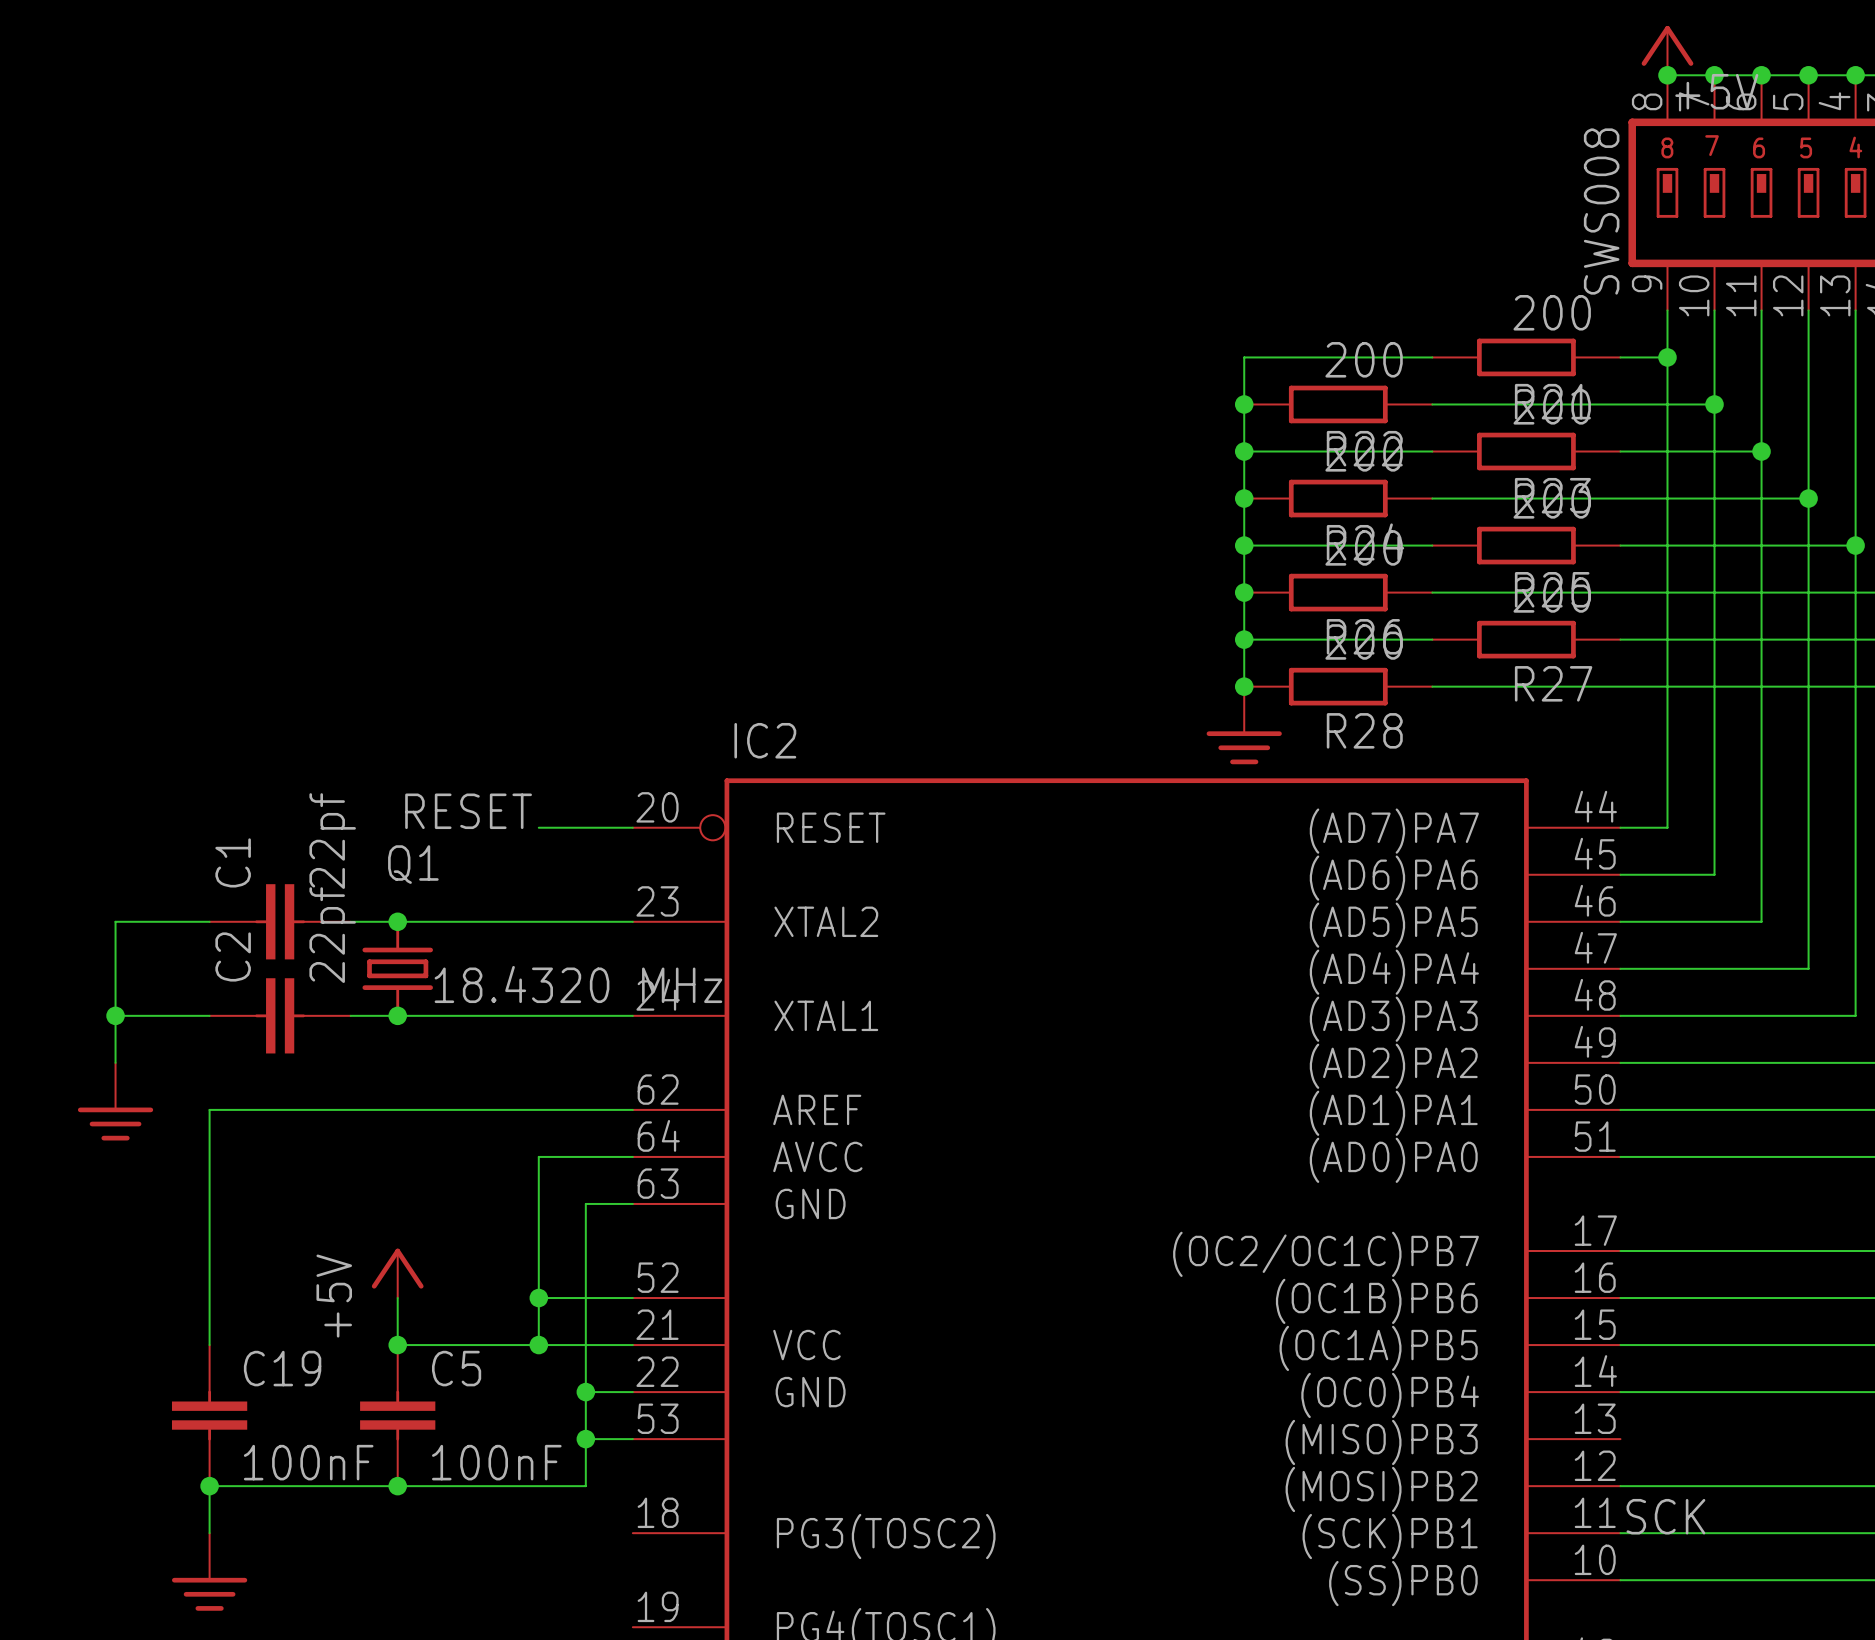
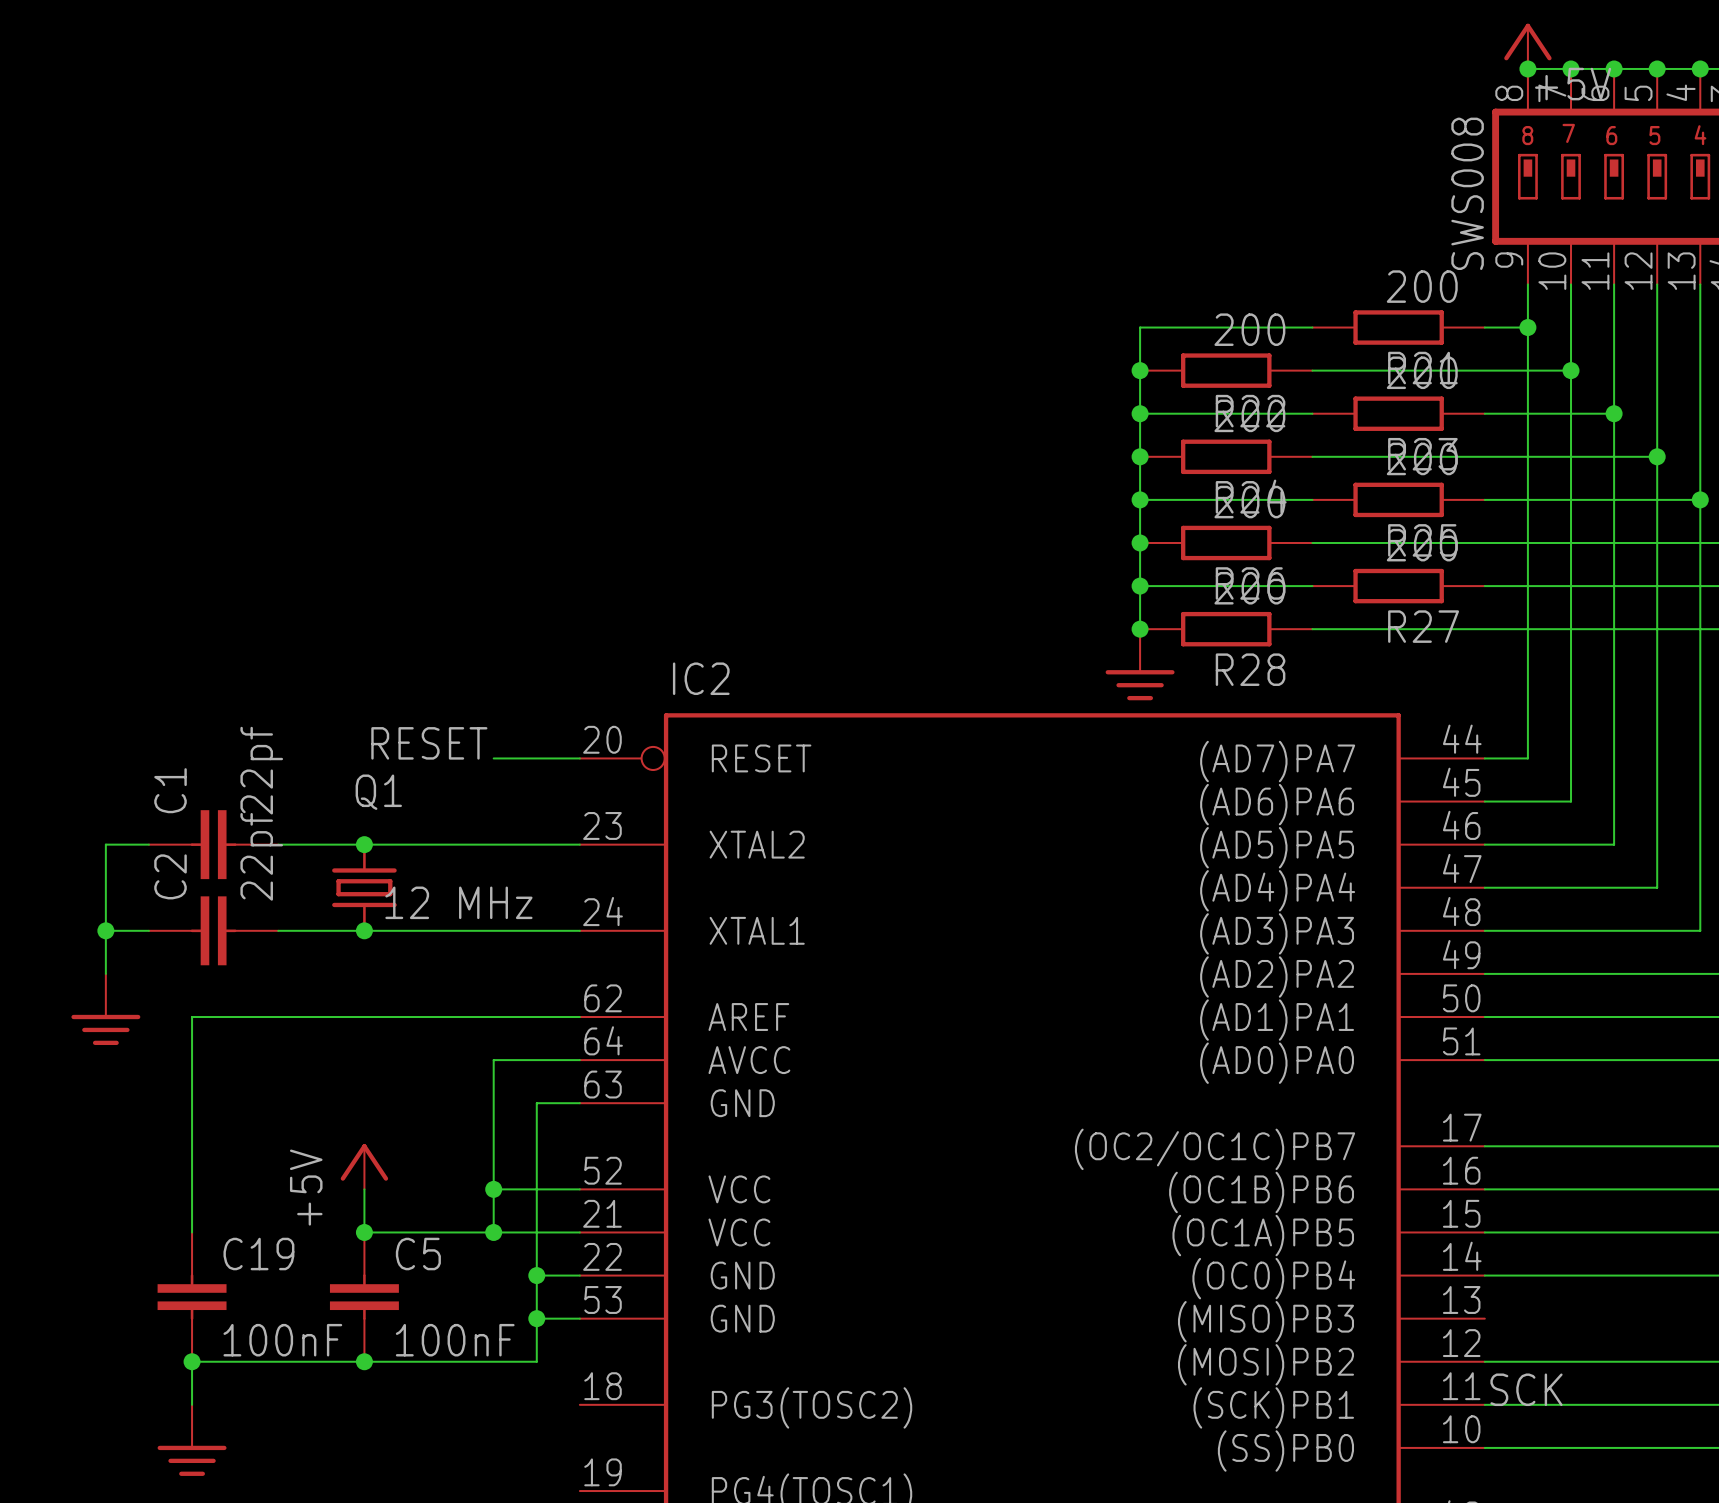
C1 position: (280, 921) -> (213, 844)
Q1 value: 18.4320 MHz (578, 984) -> 12 MHz (458, 902)
C2 position: (280, 1015) -> (213, 930)
IC2 pin name: none -> VCC (739, 1189)
IC2 pin name: none -> GND (742, 1318)

